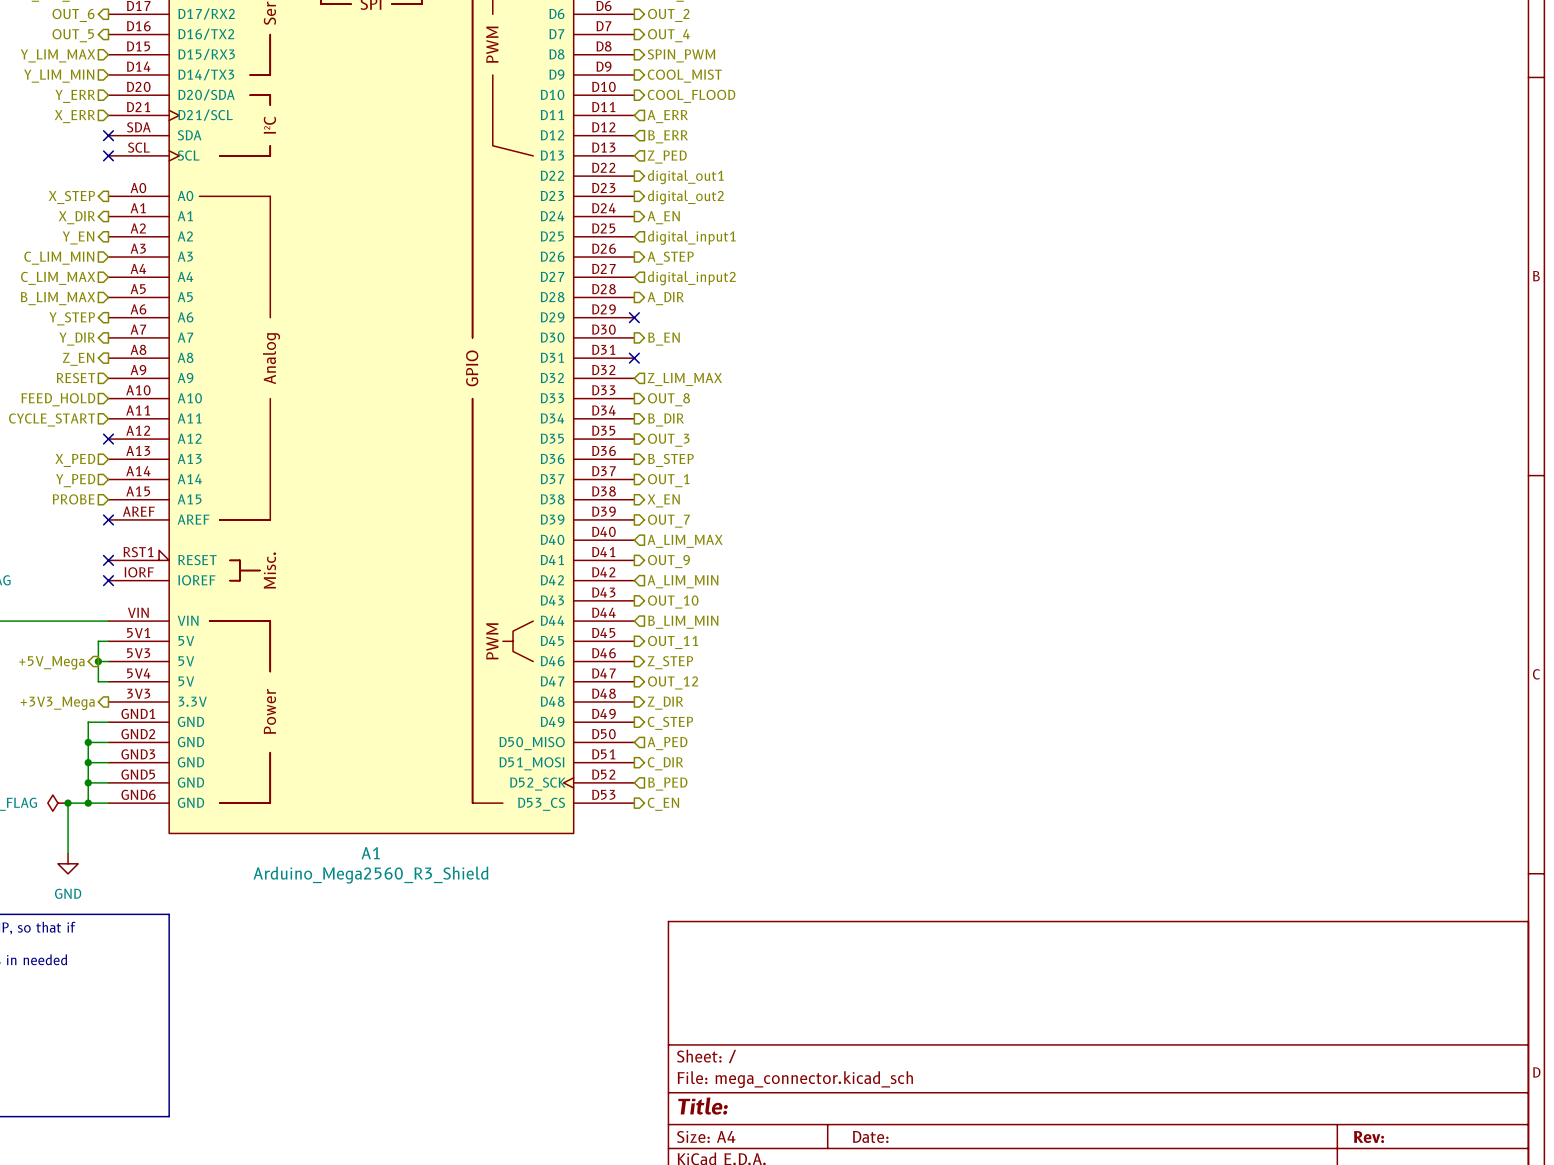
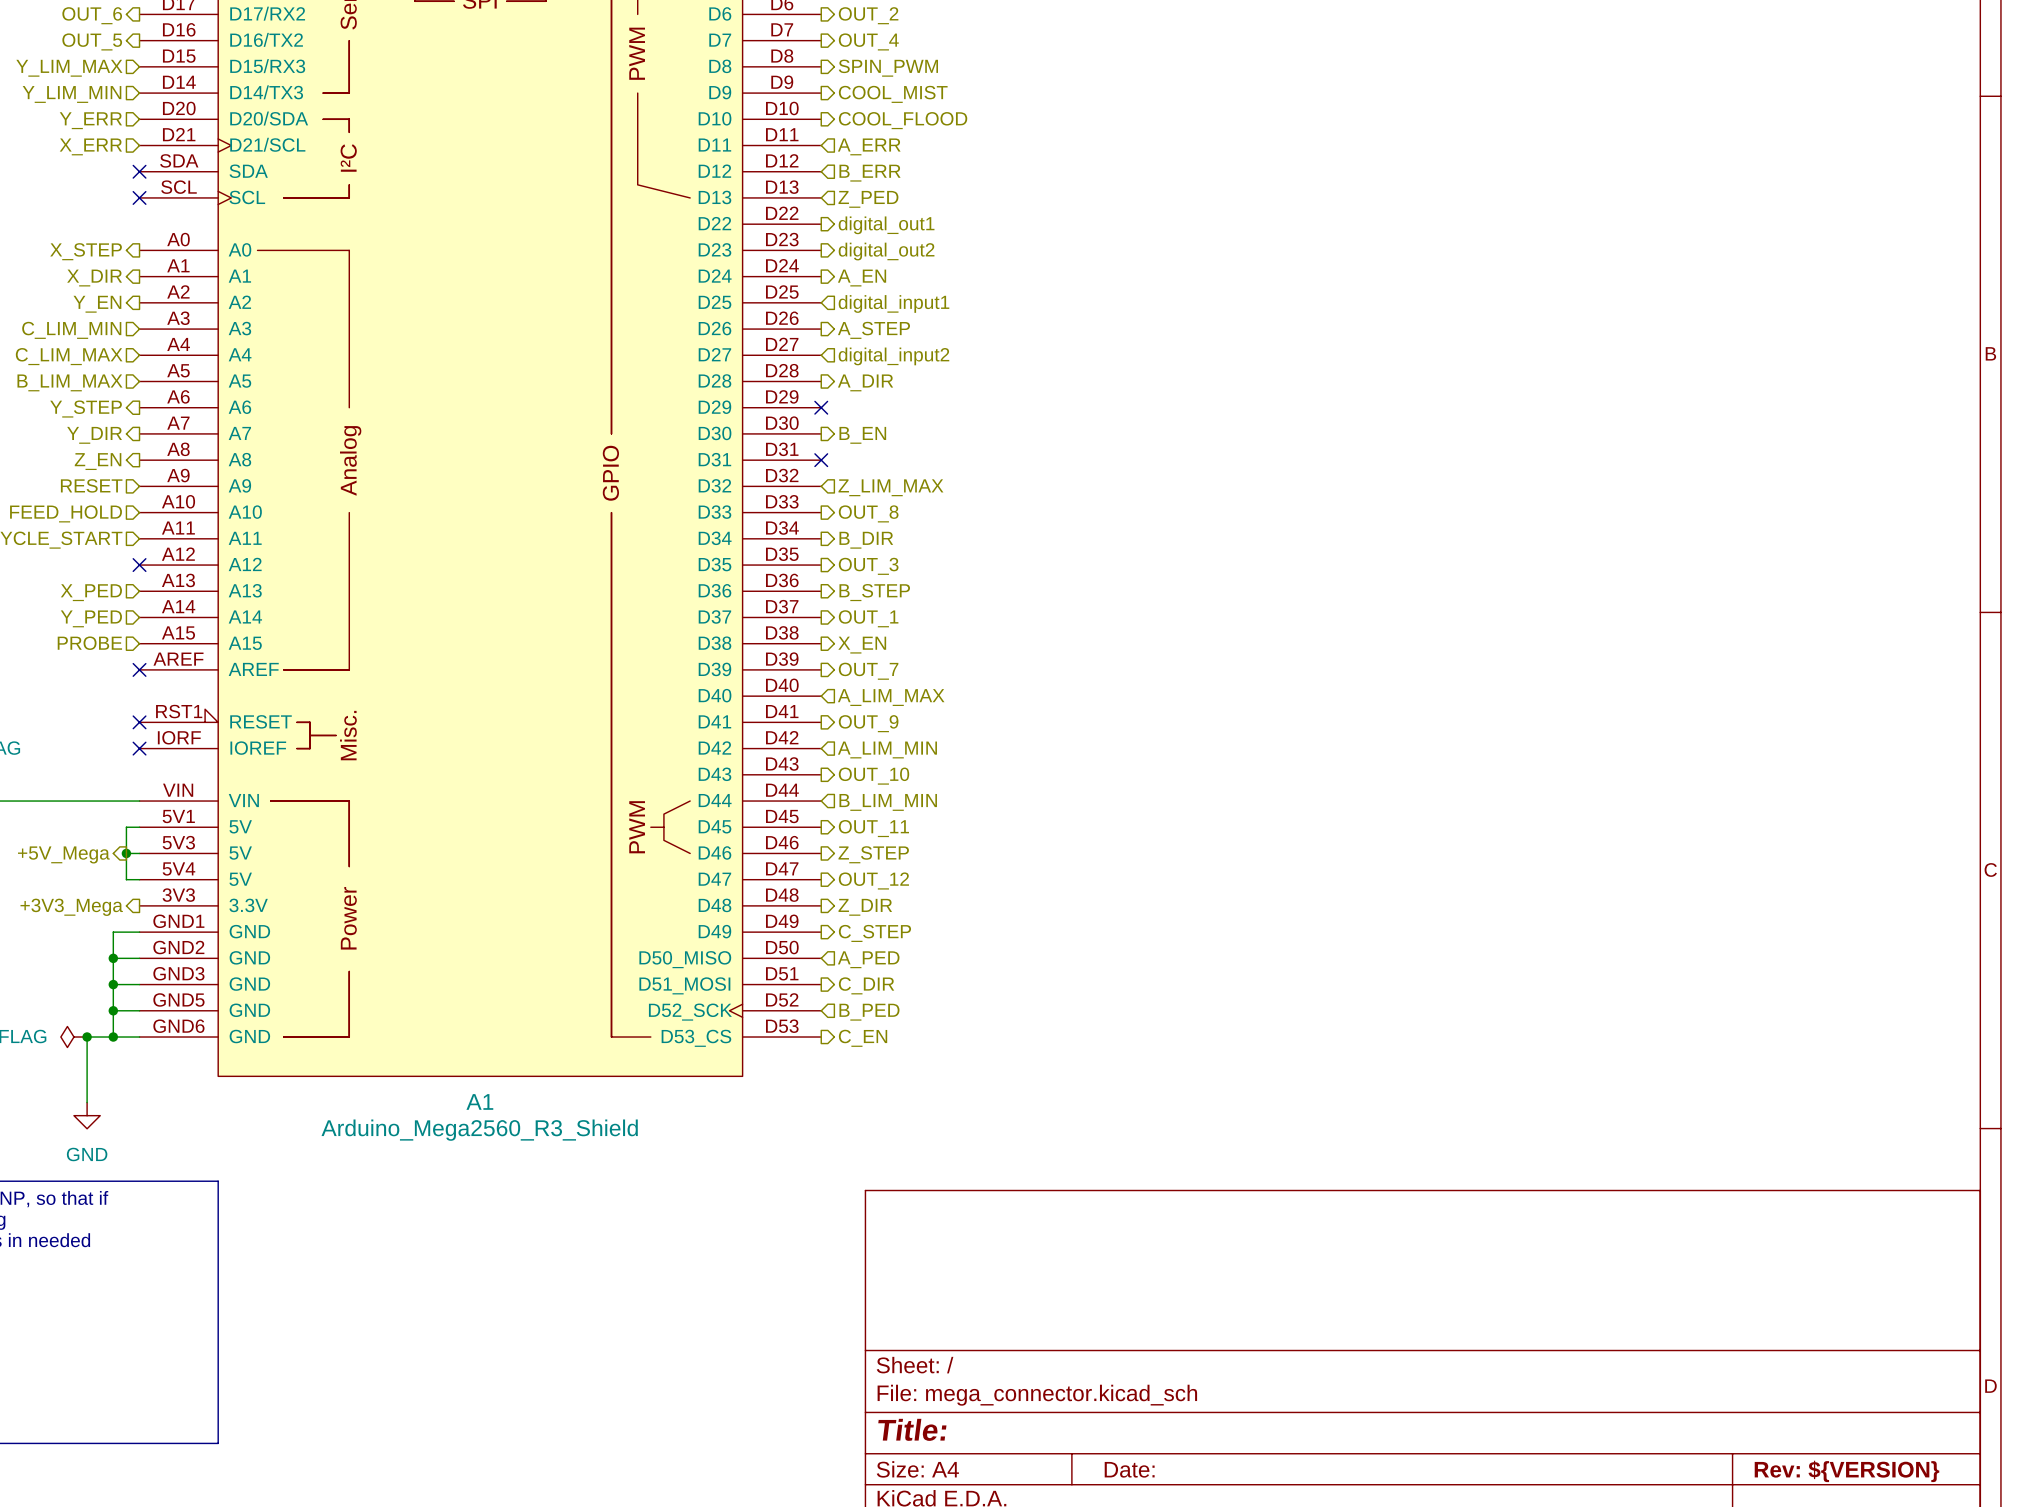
title block: Rev: (1368, 1137) -> Rev: ${VERSION} (1846, 1471)

